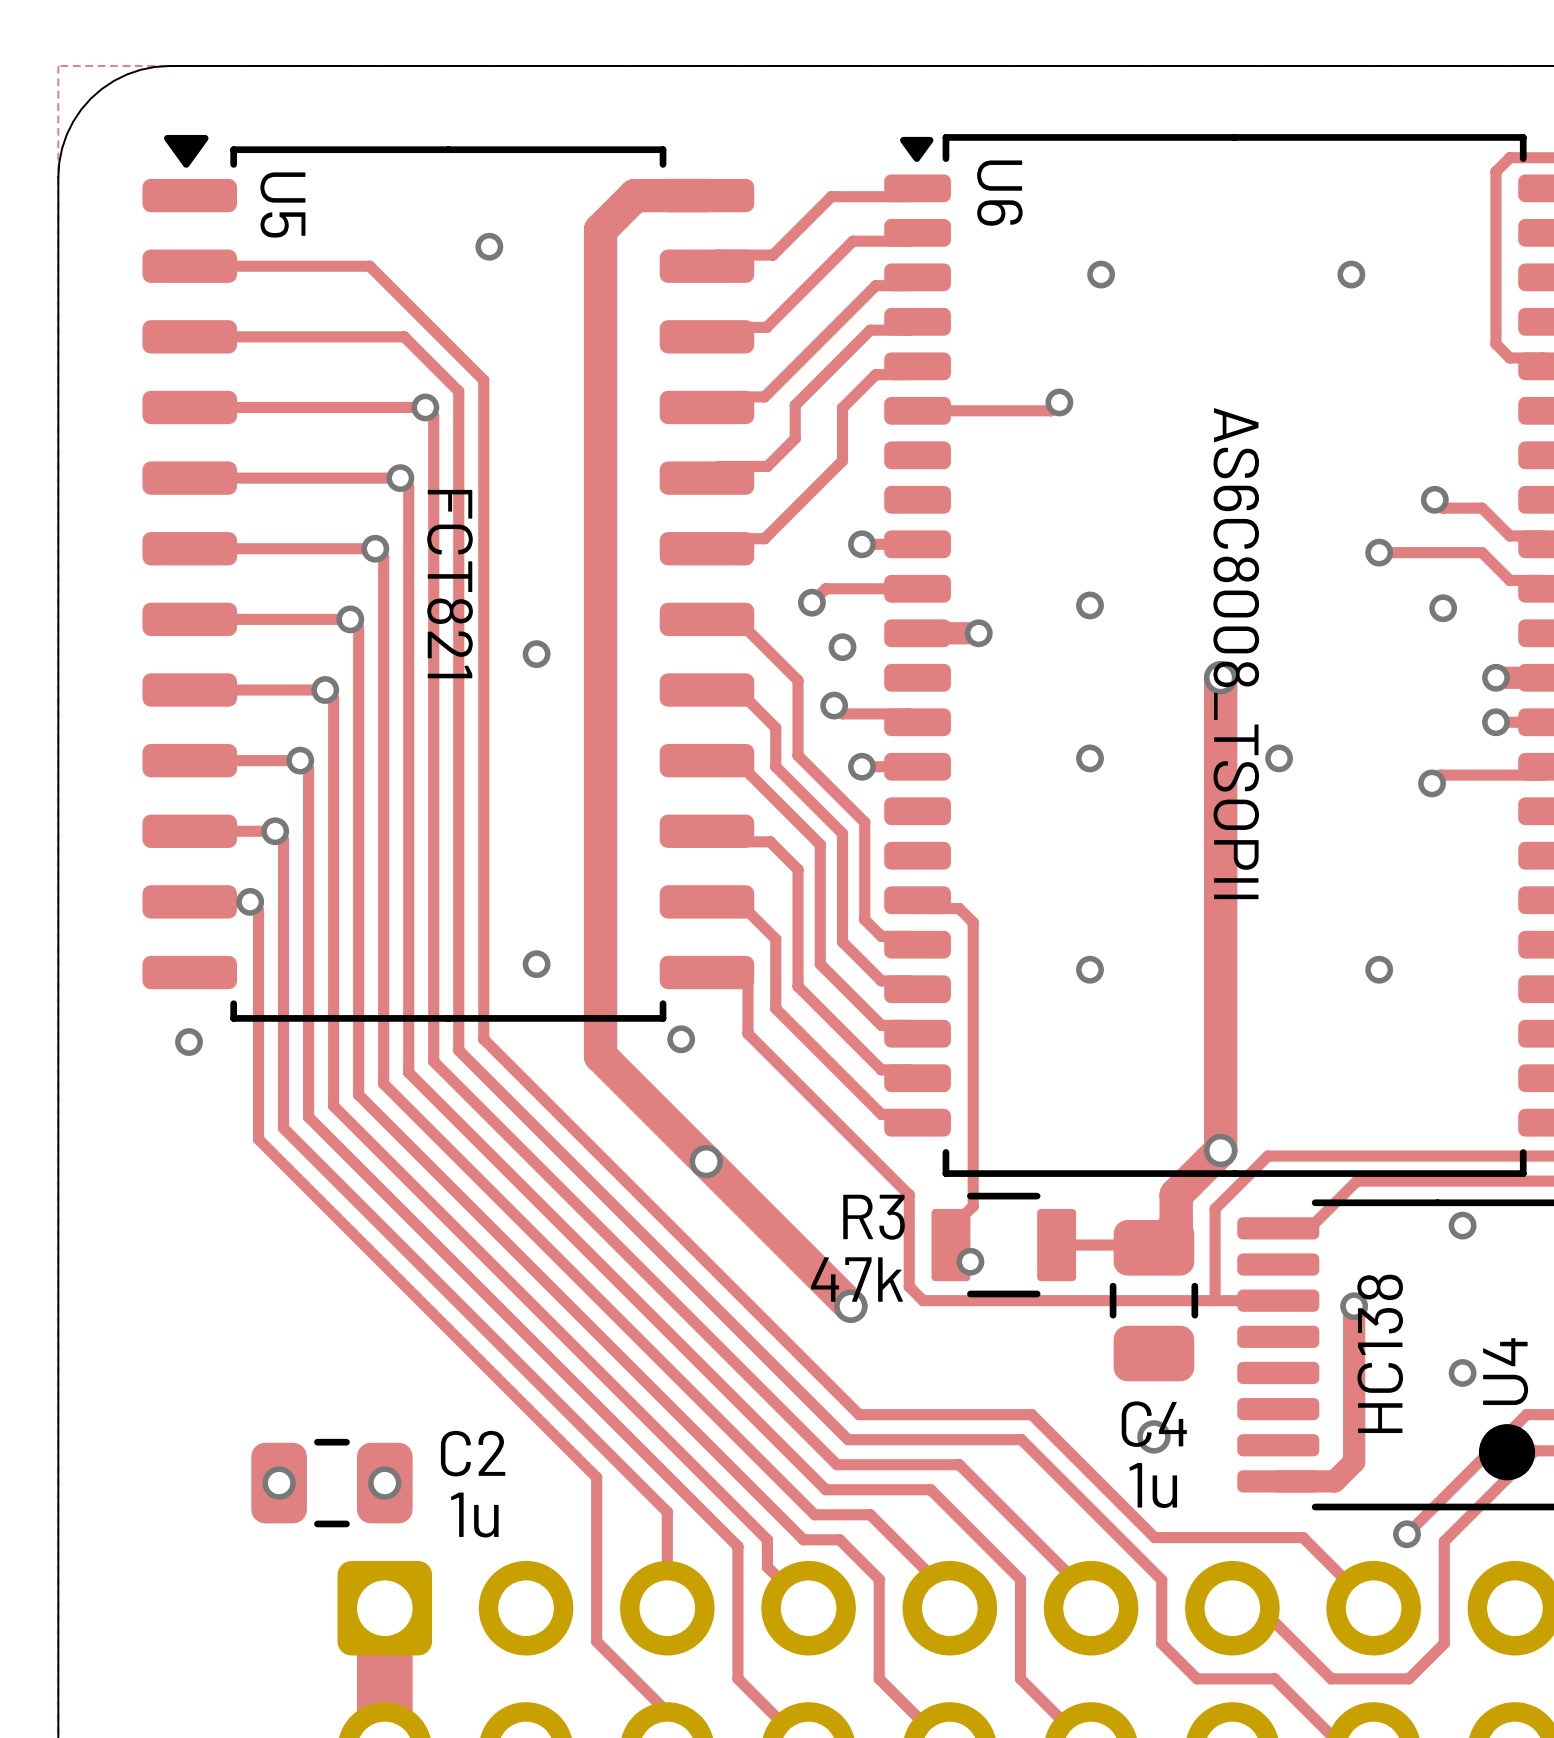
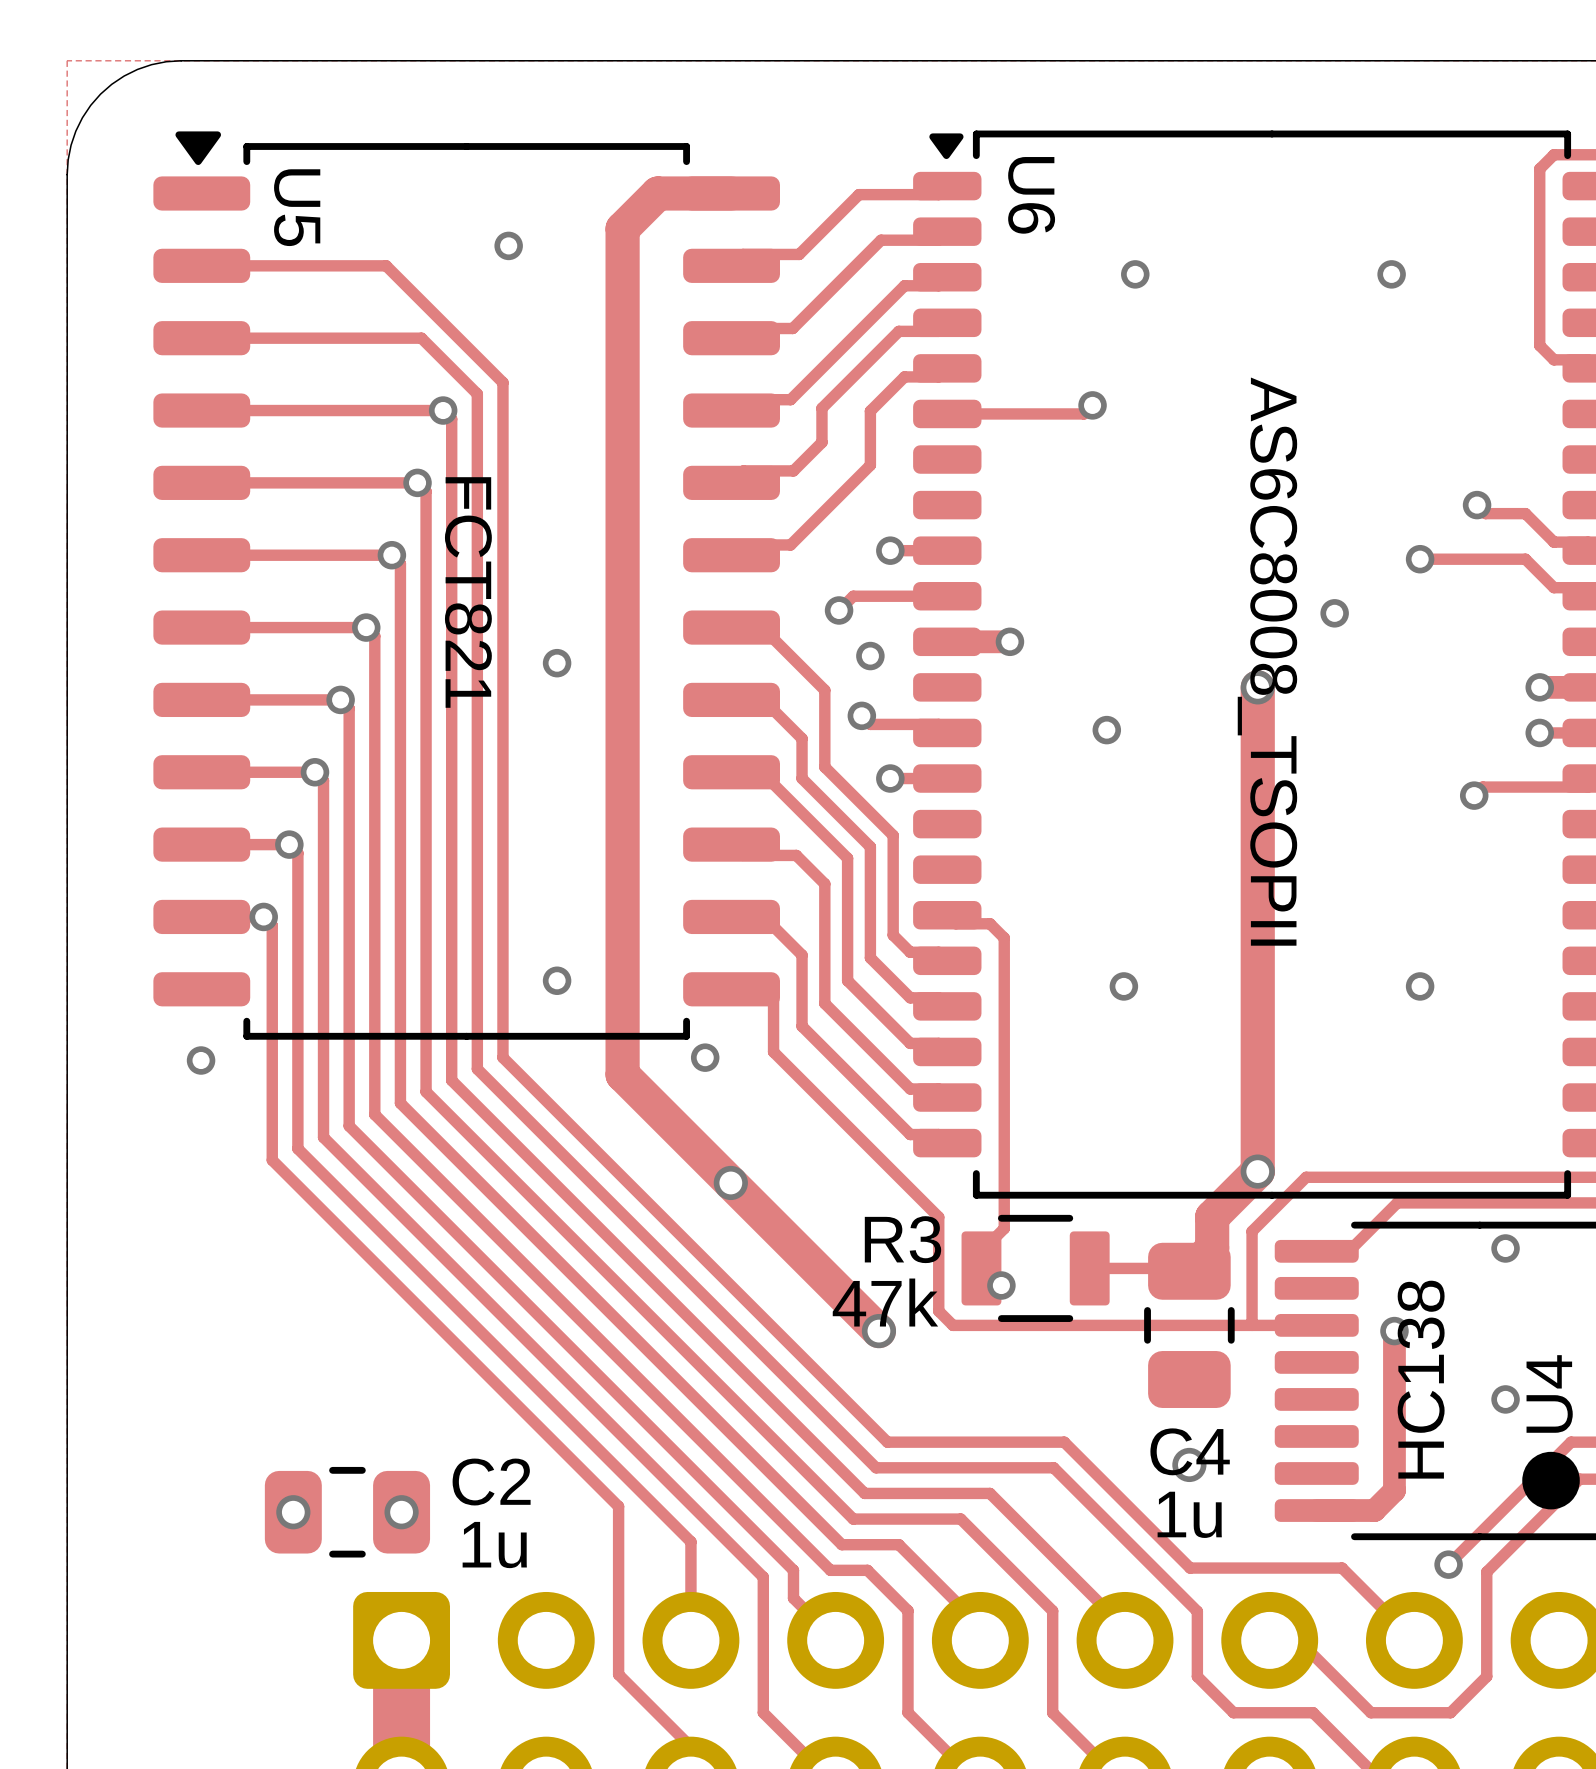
via: (1089, 605) -> none
via: none -> (1334, 613)
via: (1443, 608) -> none
via position: (1089, 758) -> (1106, 730)
via: (1279, 758) -> none

